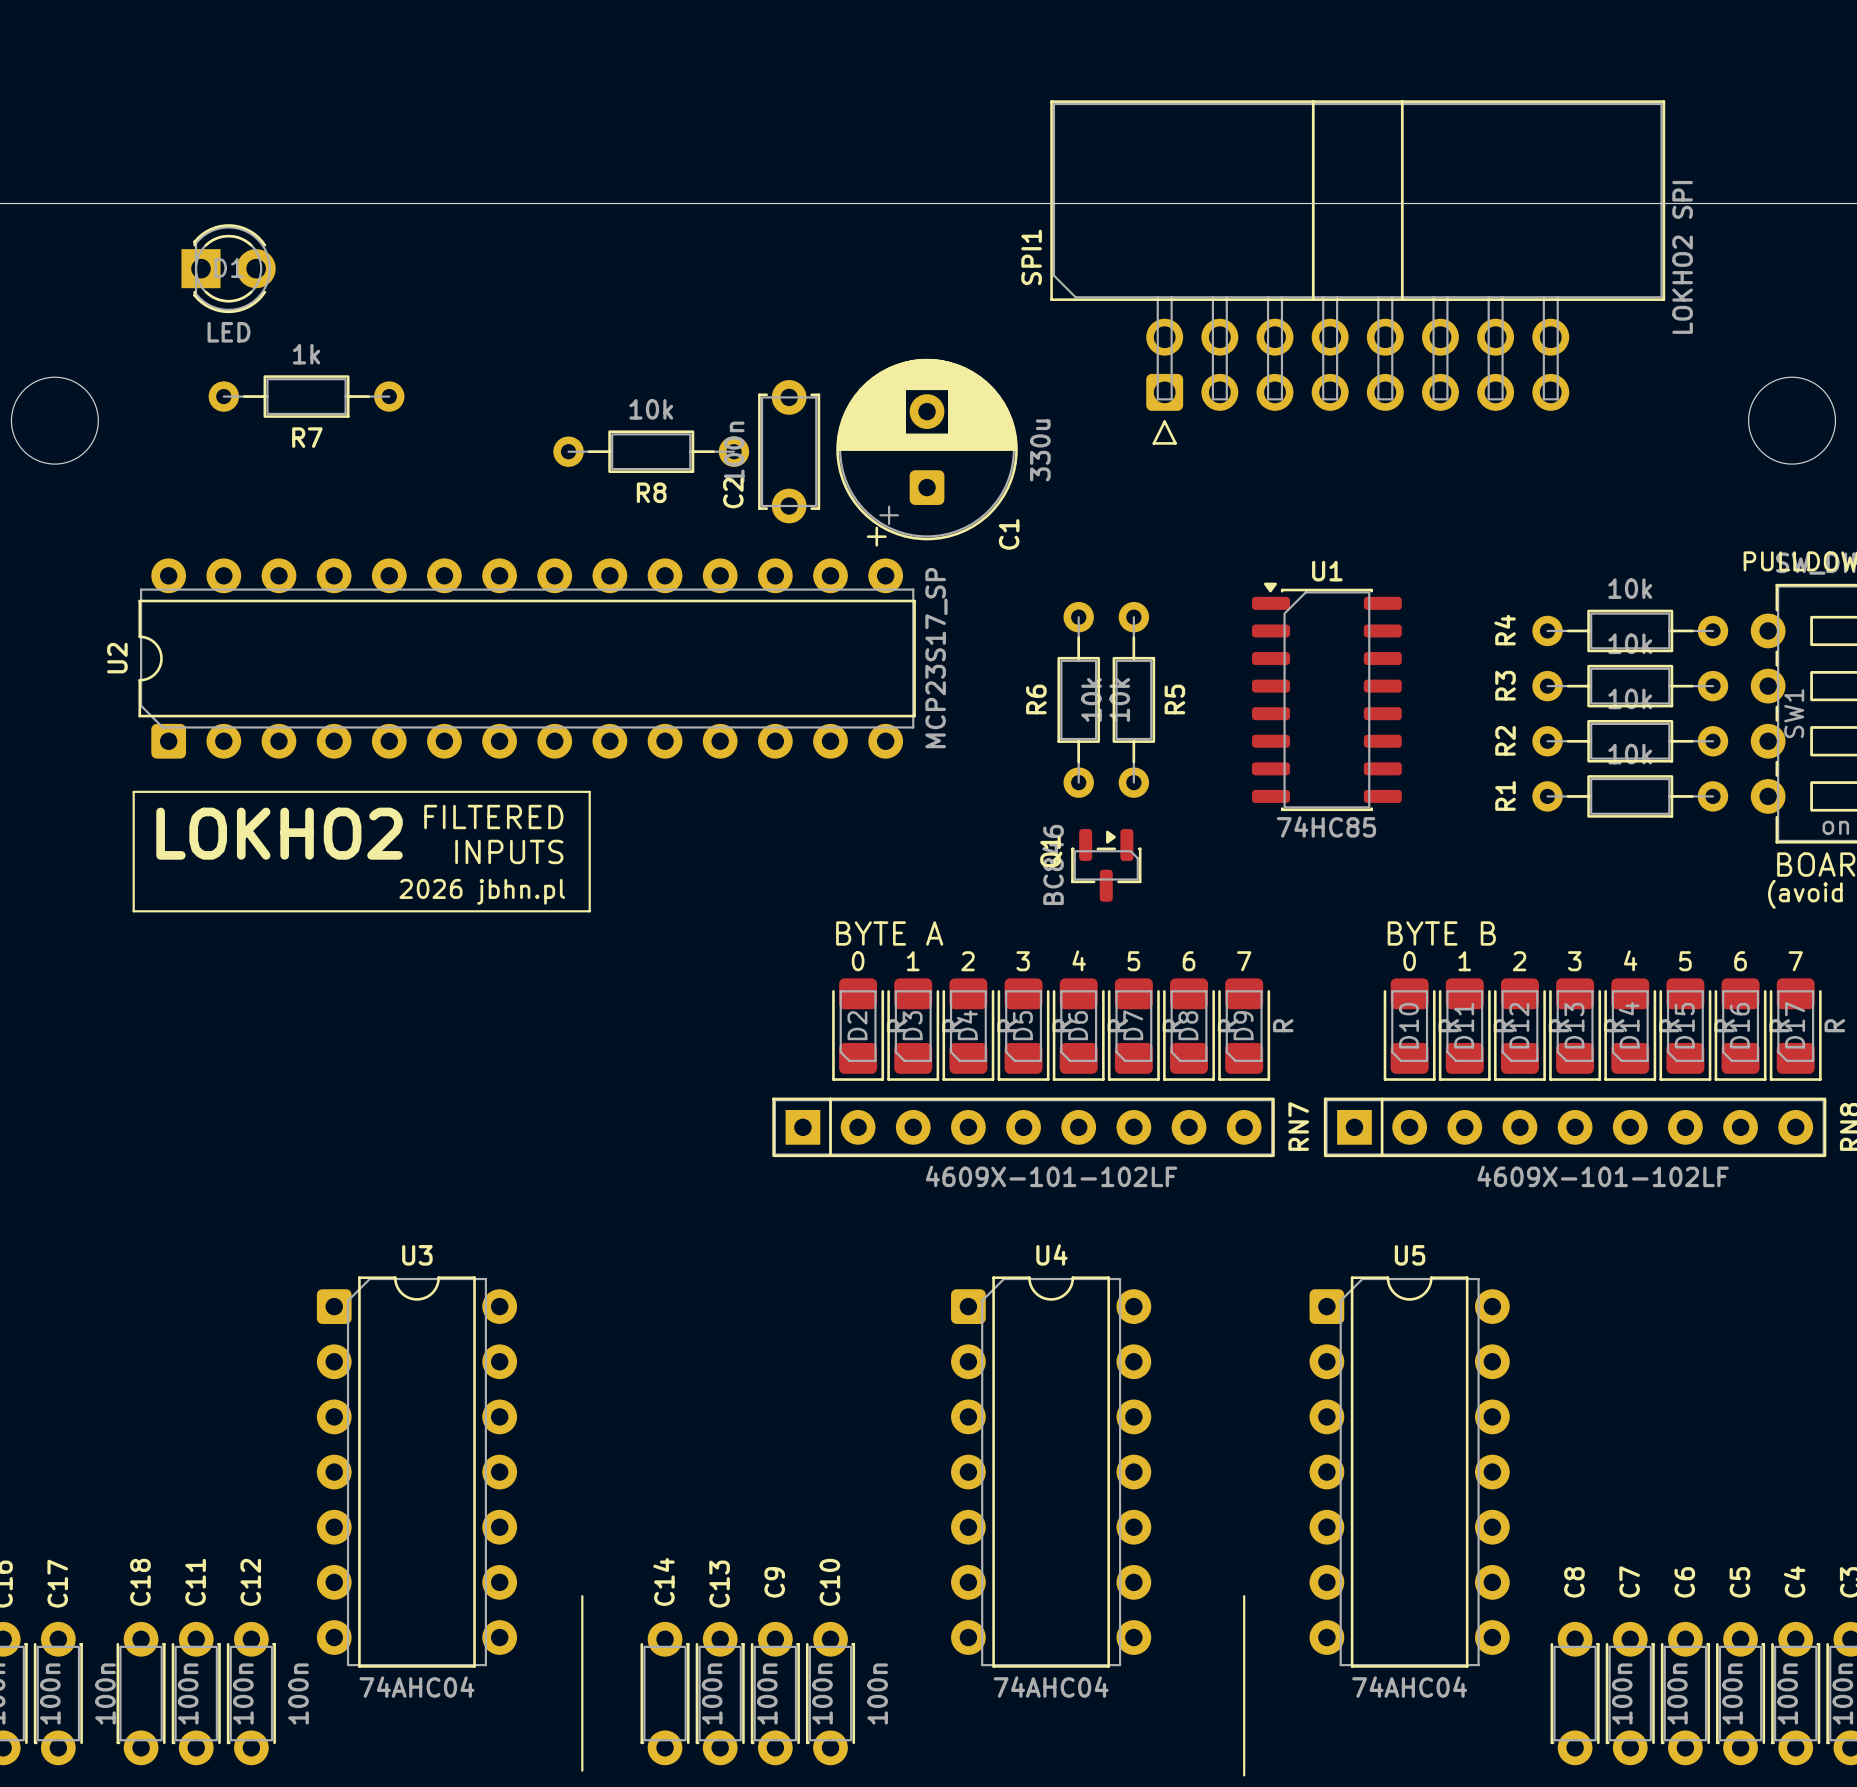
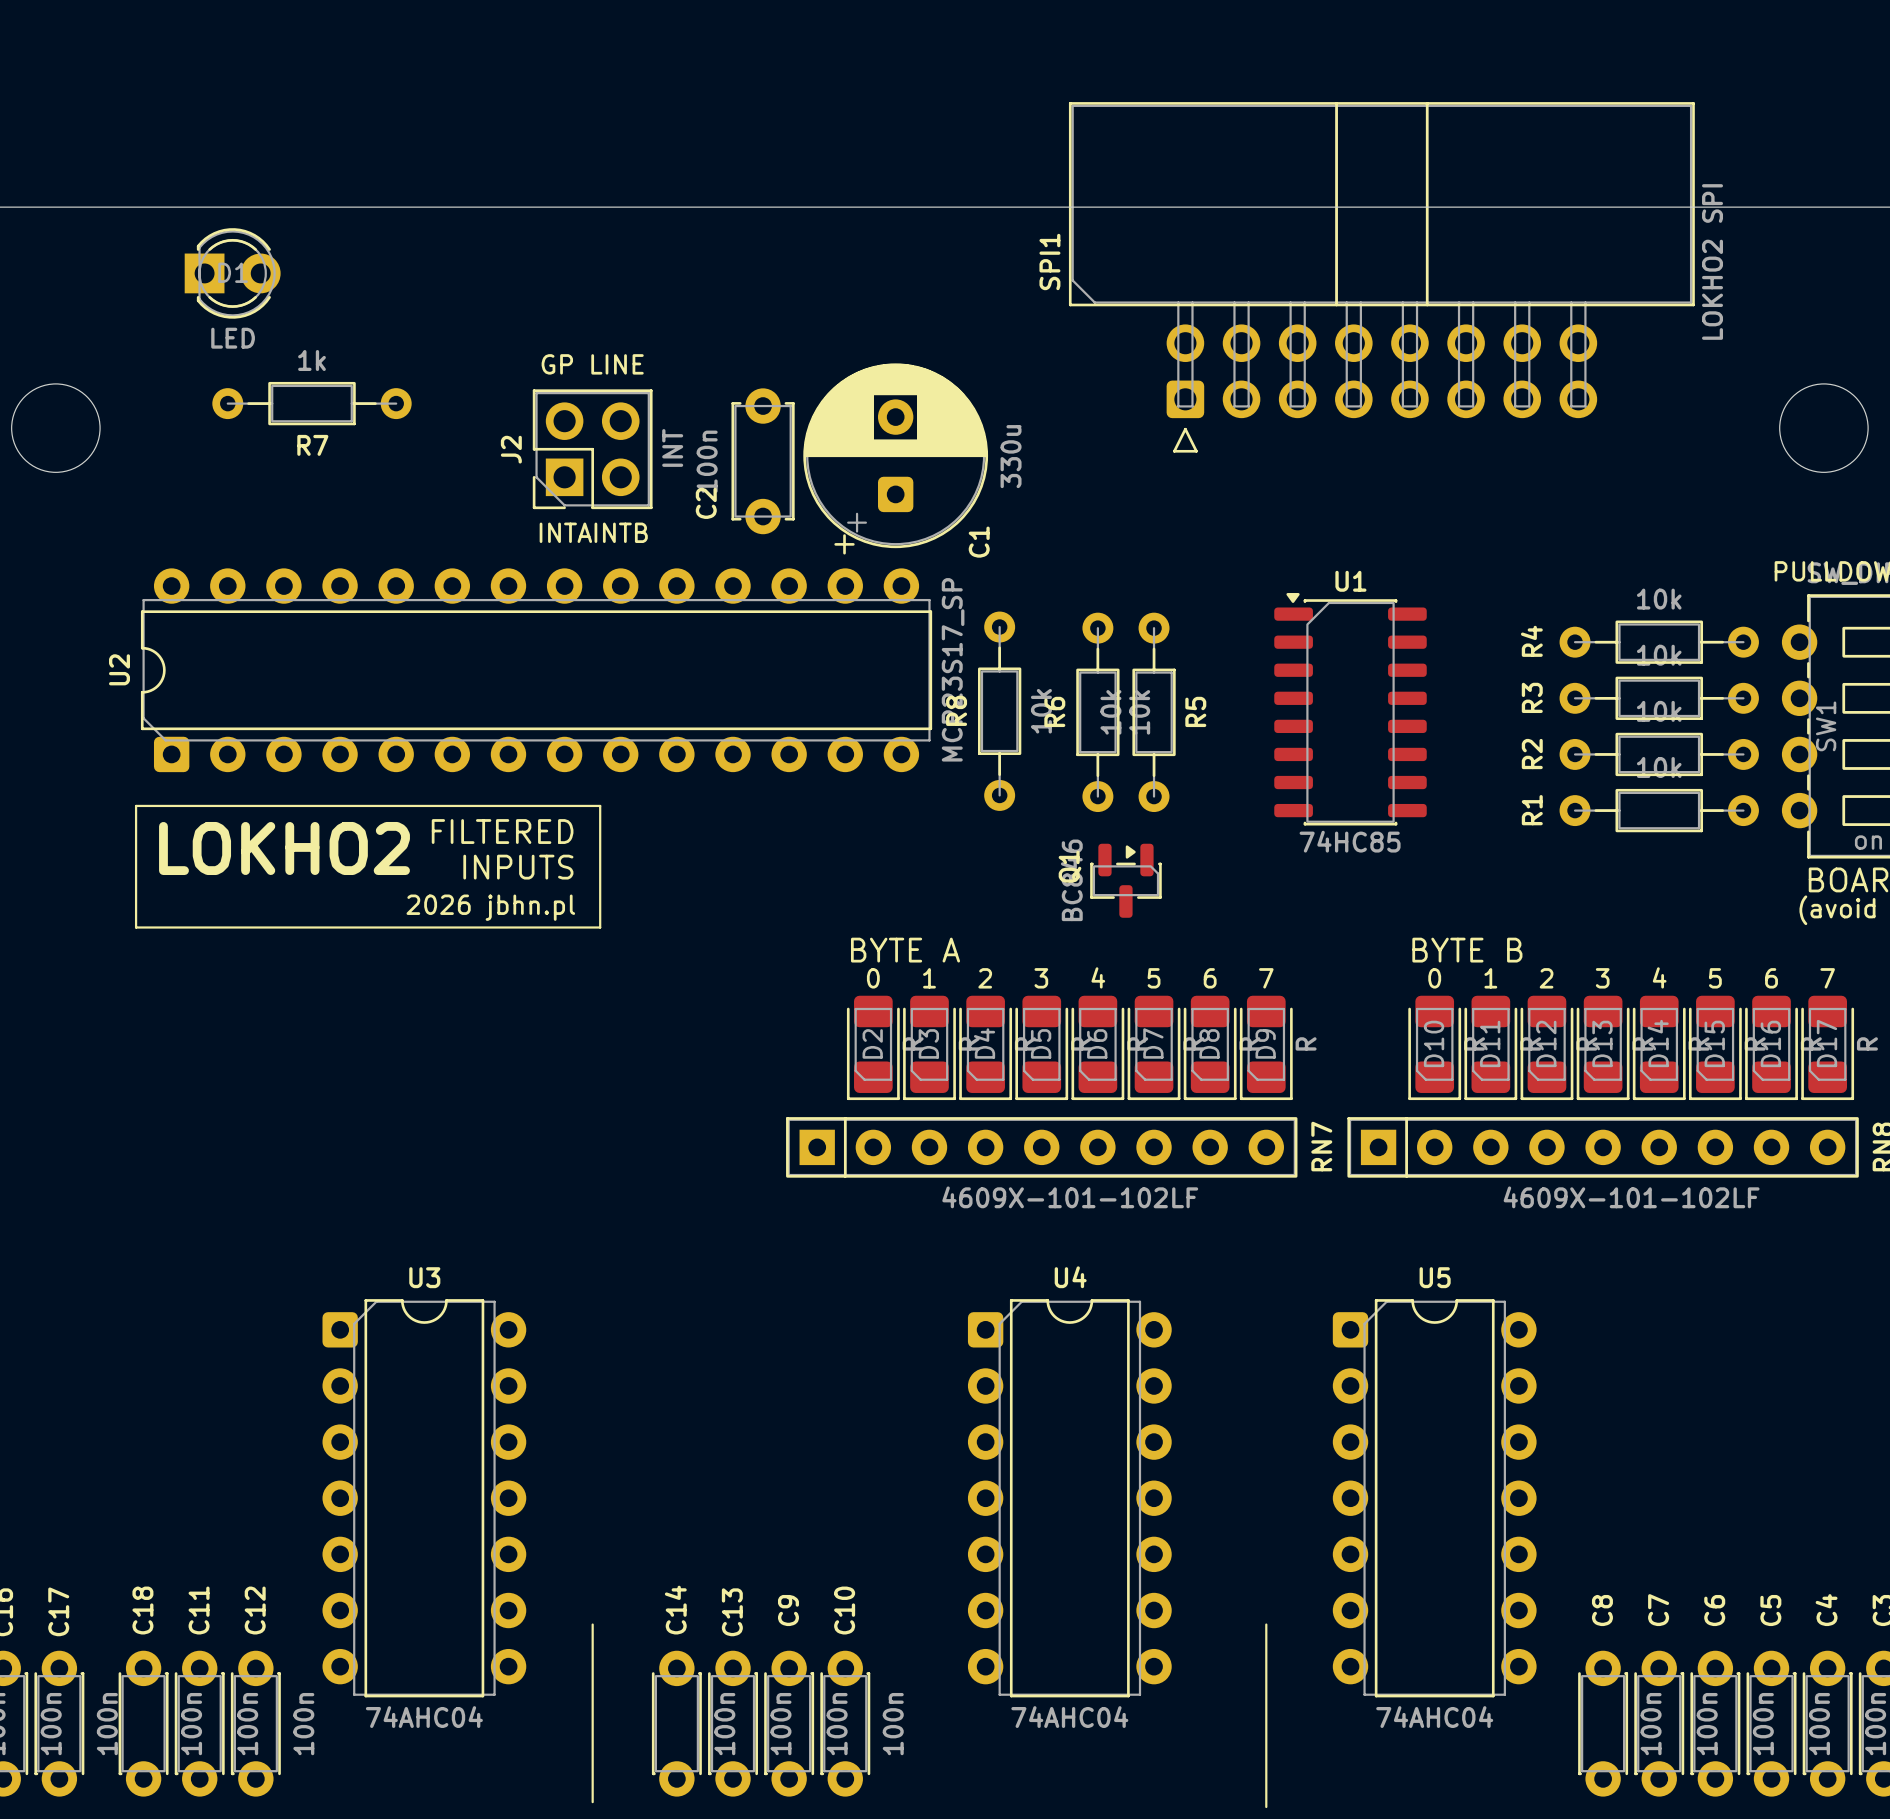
text: none -> GP LINE (592, 364)
J2: none -> INT (592, 449)
R8 rotation: 0° (651, 451) -> 90° clockwise (999, 711)
R8 position: (651, 451) -> (999, 711)
C2 position: (789, 451) -> (763, 461)
C1 position: (927, 452) -> (895, 458)
text: none -> INTA (565, 532)
text: none -> INTB (621, 532)

